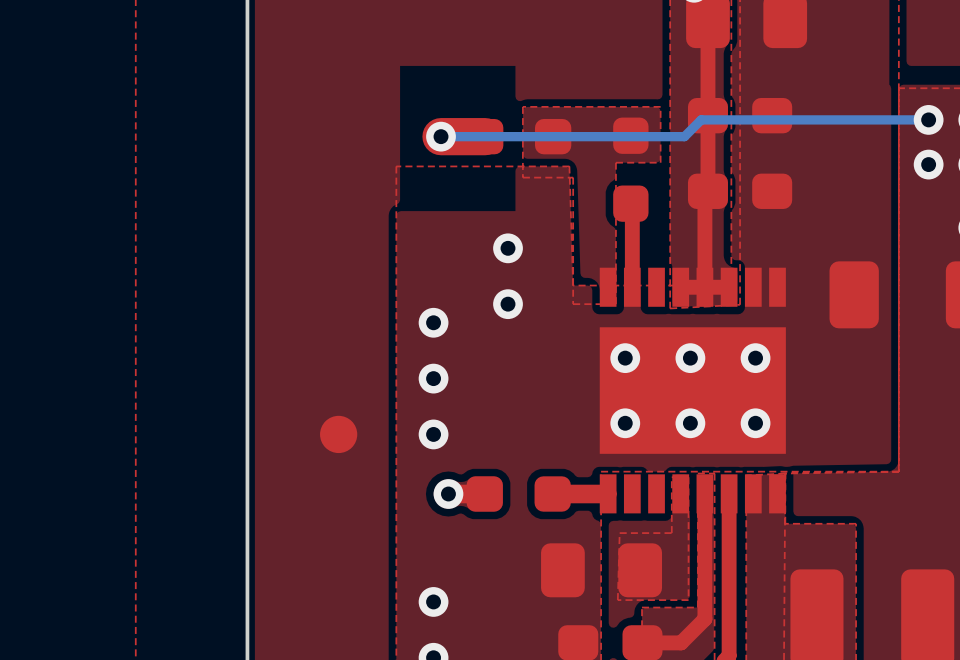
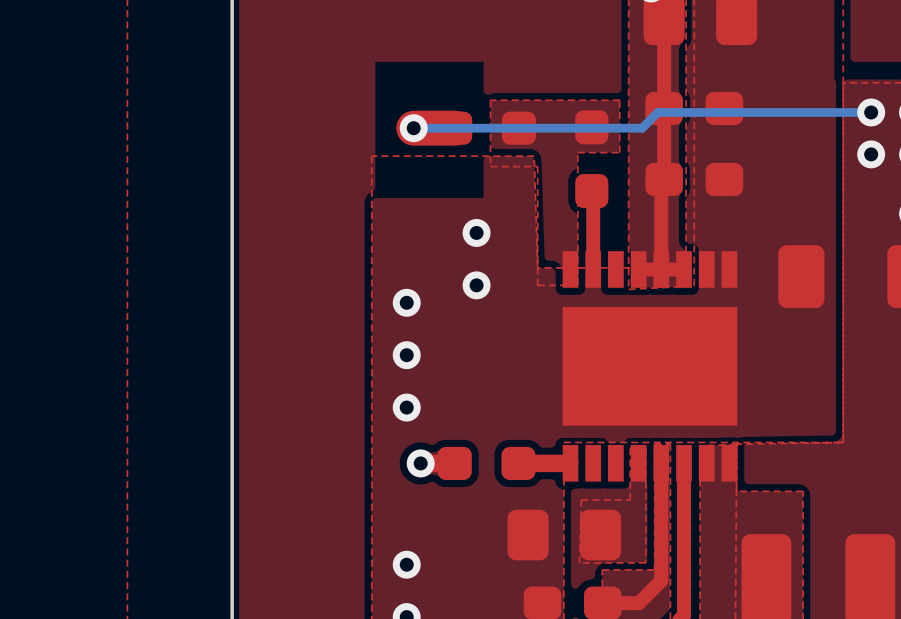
via: (625, 358) -> none
via: (690, 358) -> none
via: (755, 358) -> none
via: (625, 423) -> none
via: (690, 423) -> none
via: (755, 423) -> none
part: (338, 434) -> none

